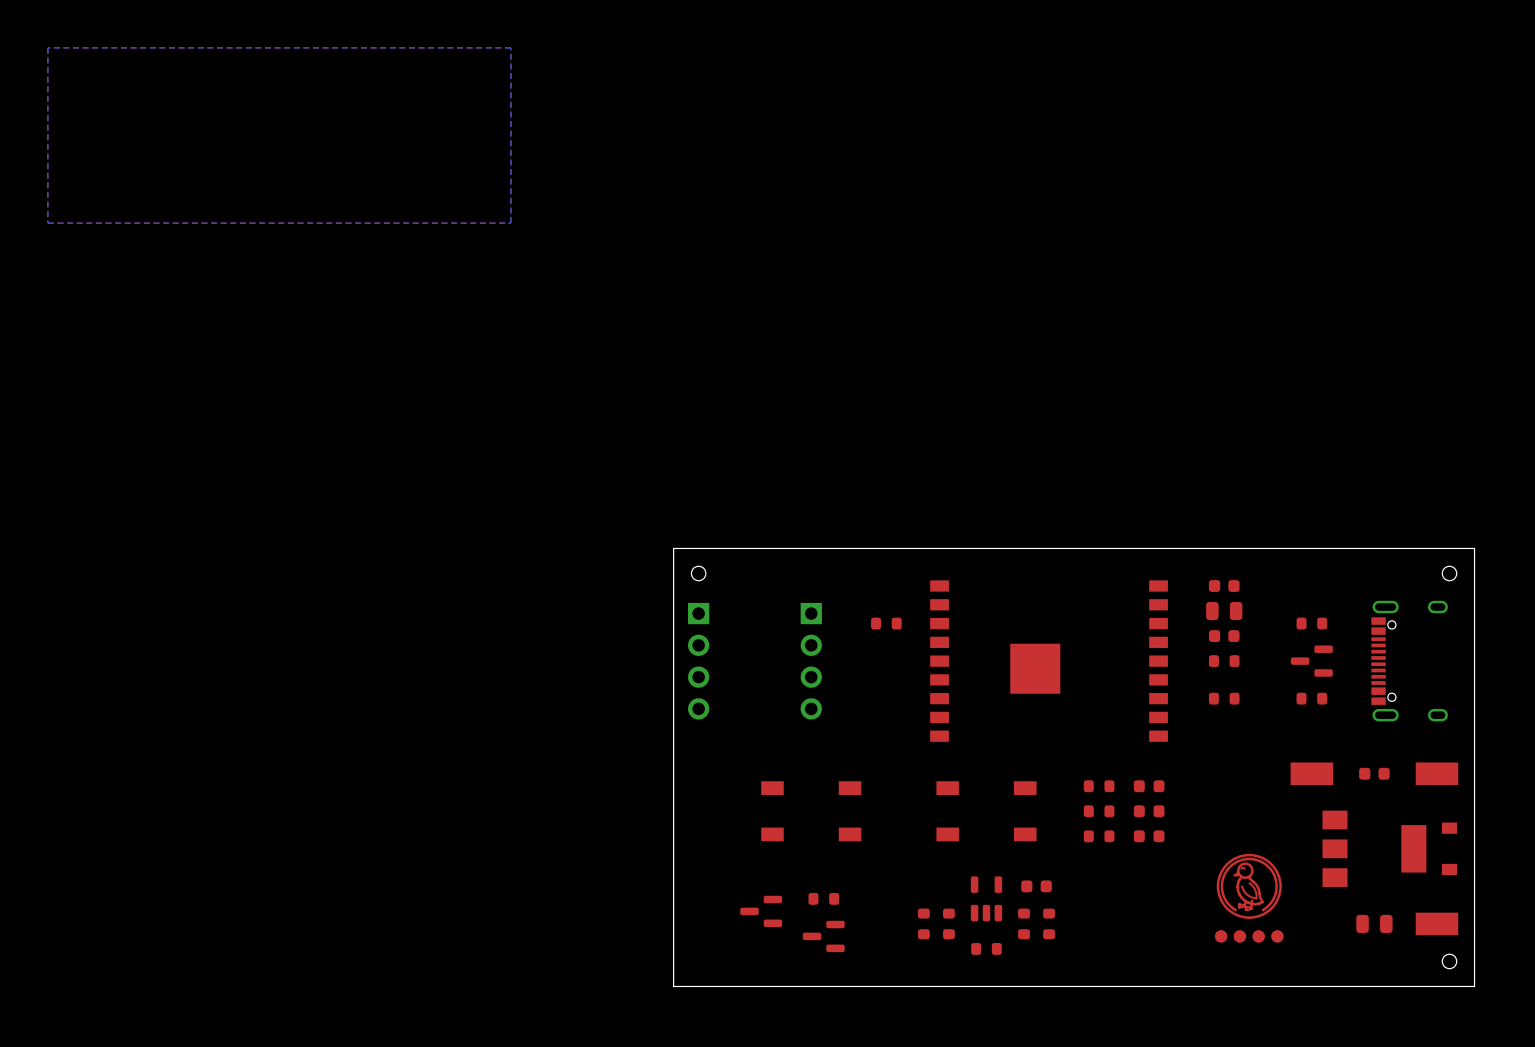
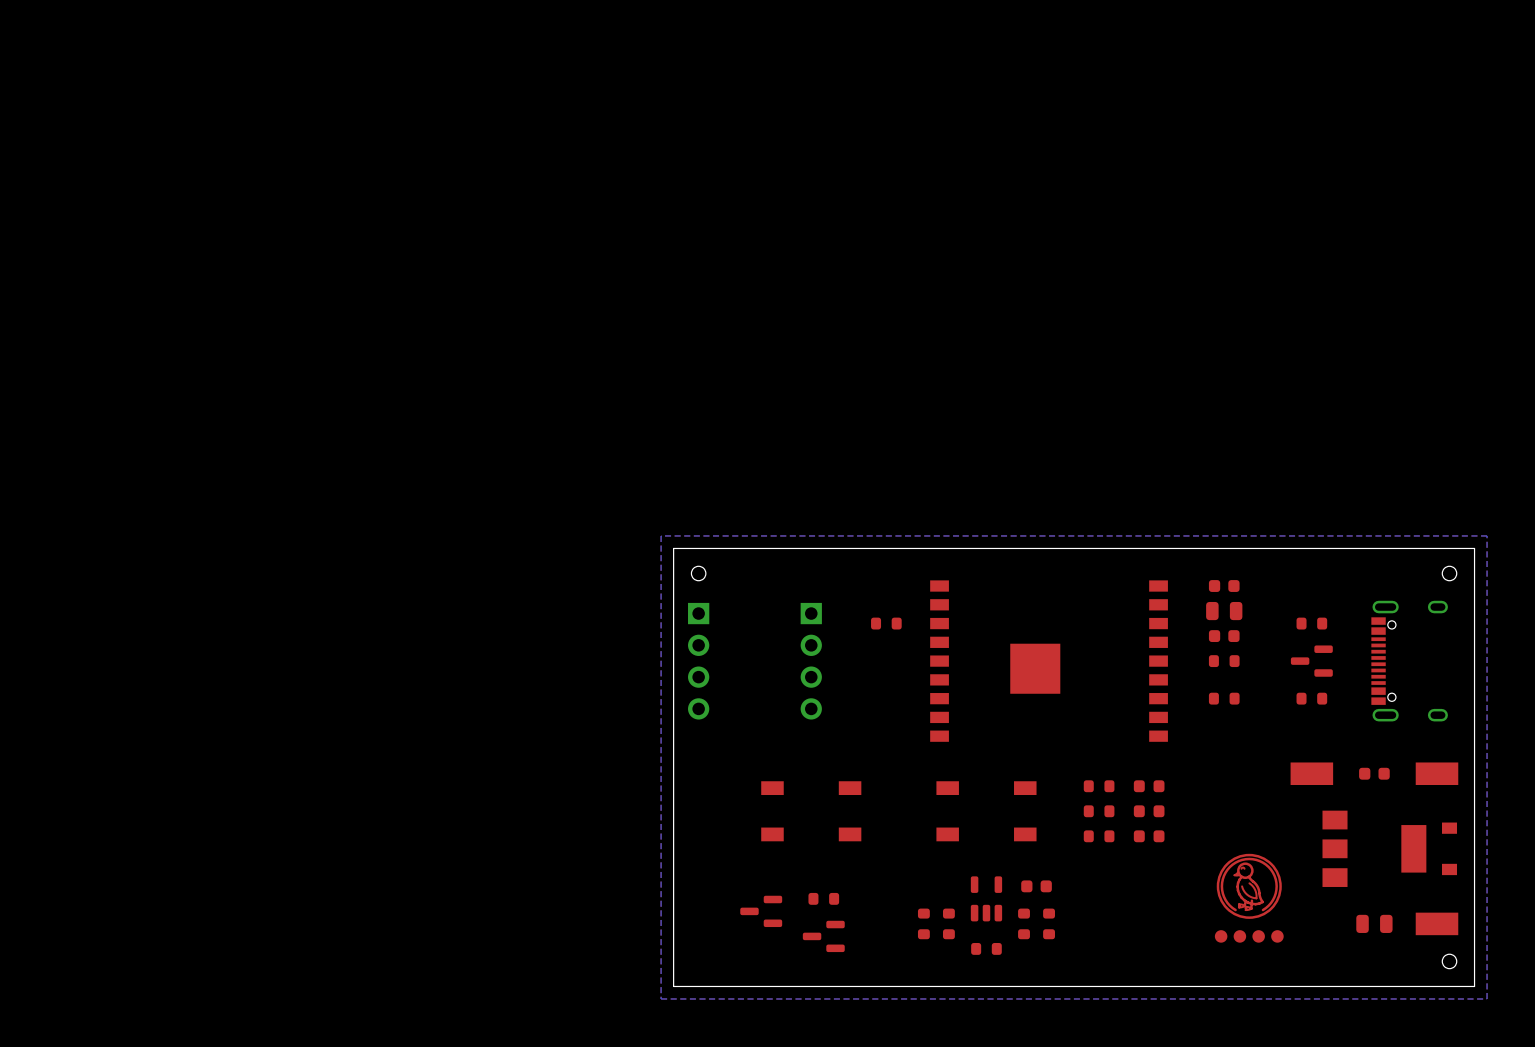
bottom zone outline: (510, 47) (510, 223) (47, 223) (47, 47) (510, 47) -> none
top zone outline: (510, 47) (510, 223) (47, 223) (47, 47) (510, 47) -> none
bottom zone outline: none -> (1487, 535) (1487, 998) (661, 998) (661, 535) (1487, 535)
top zone outline: none -> (1487, 535) (1487, 998) (661, 998) (661, 535) (1487, 535)

